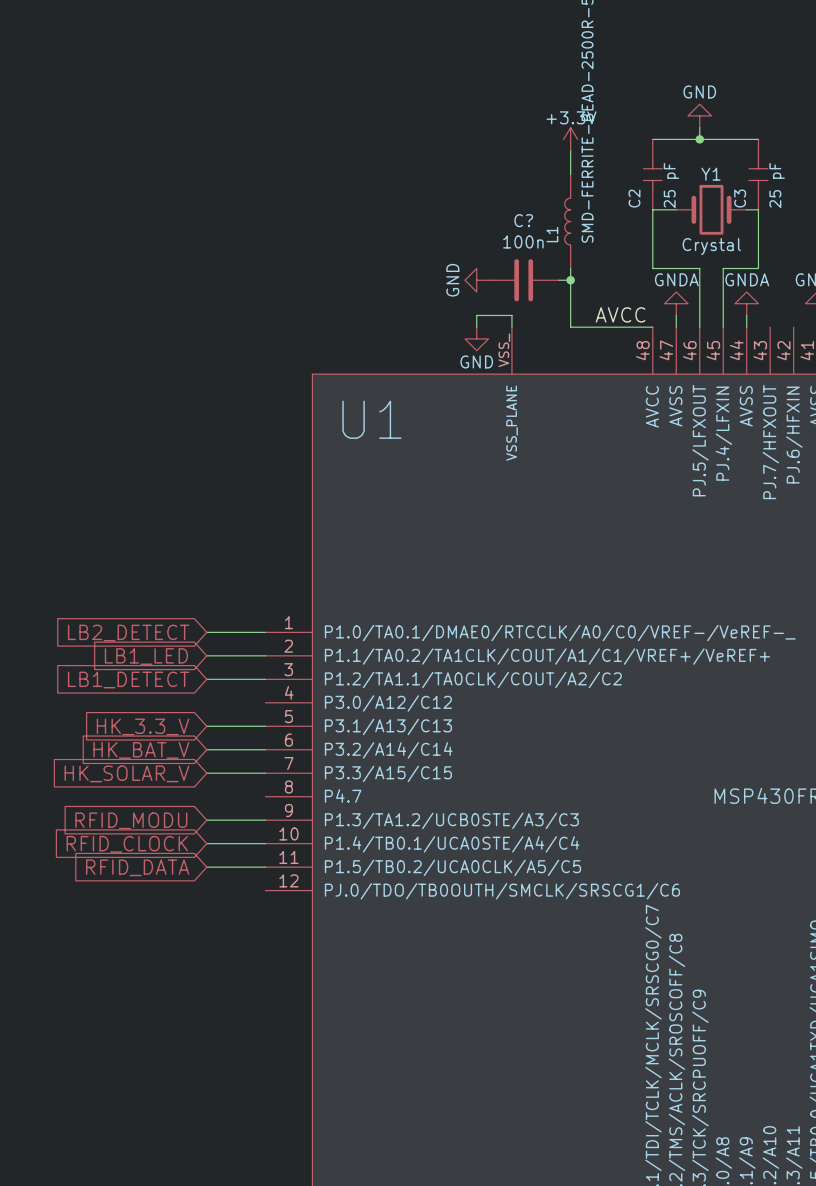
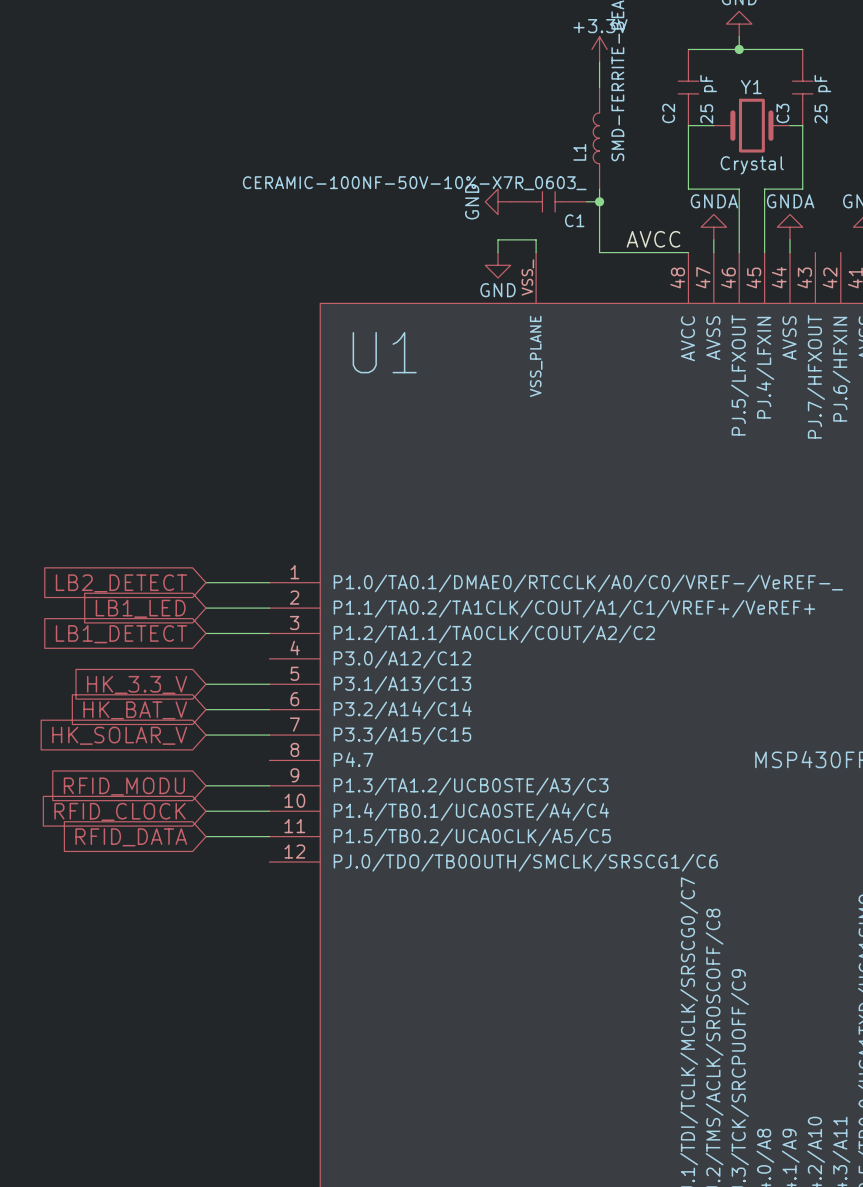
C?: 100n (523, 280) -> none
C1: none -> CERAMIC-100NF-50V-10%-X7R_0603_ (548, 201)

